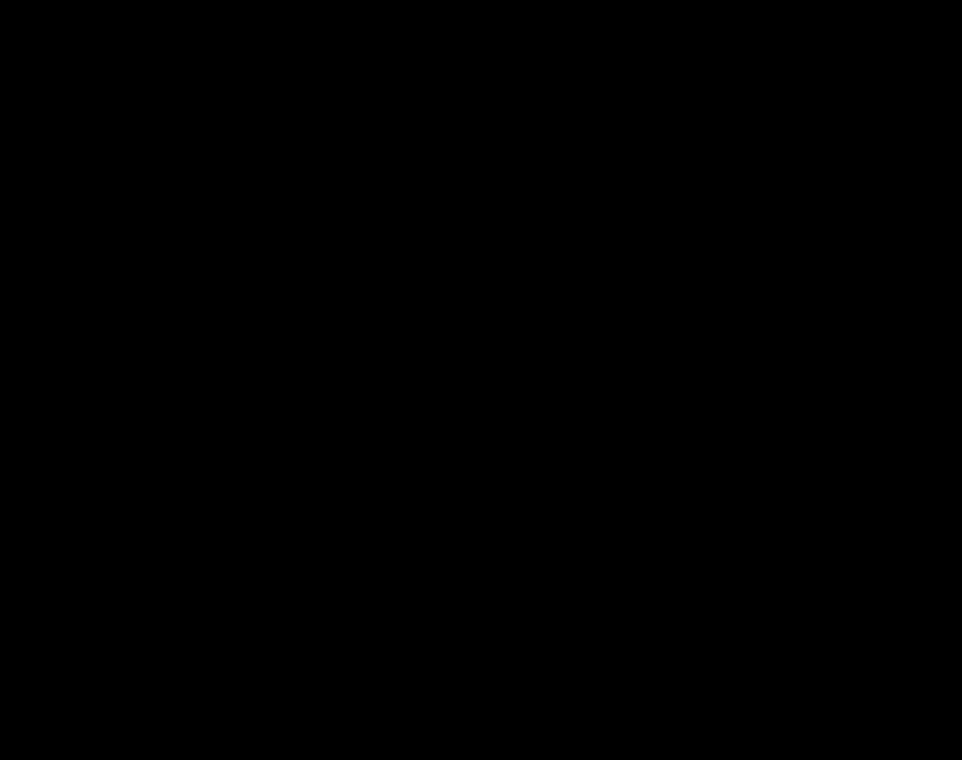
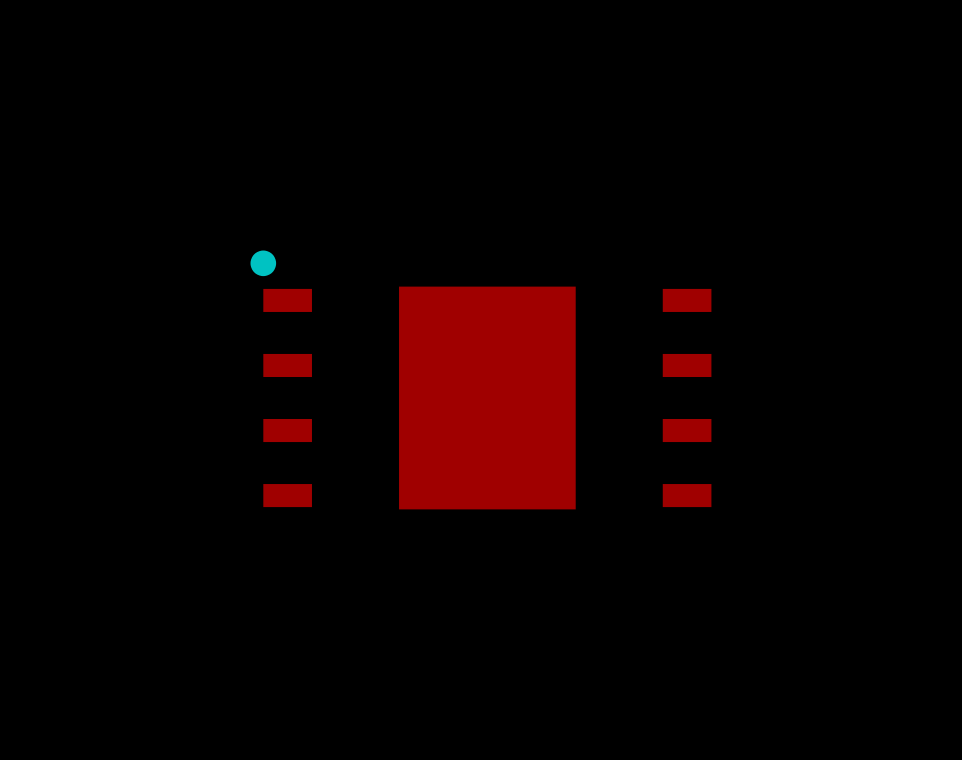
part: none -> (480, 379)

